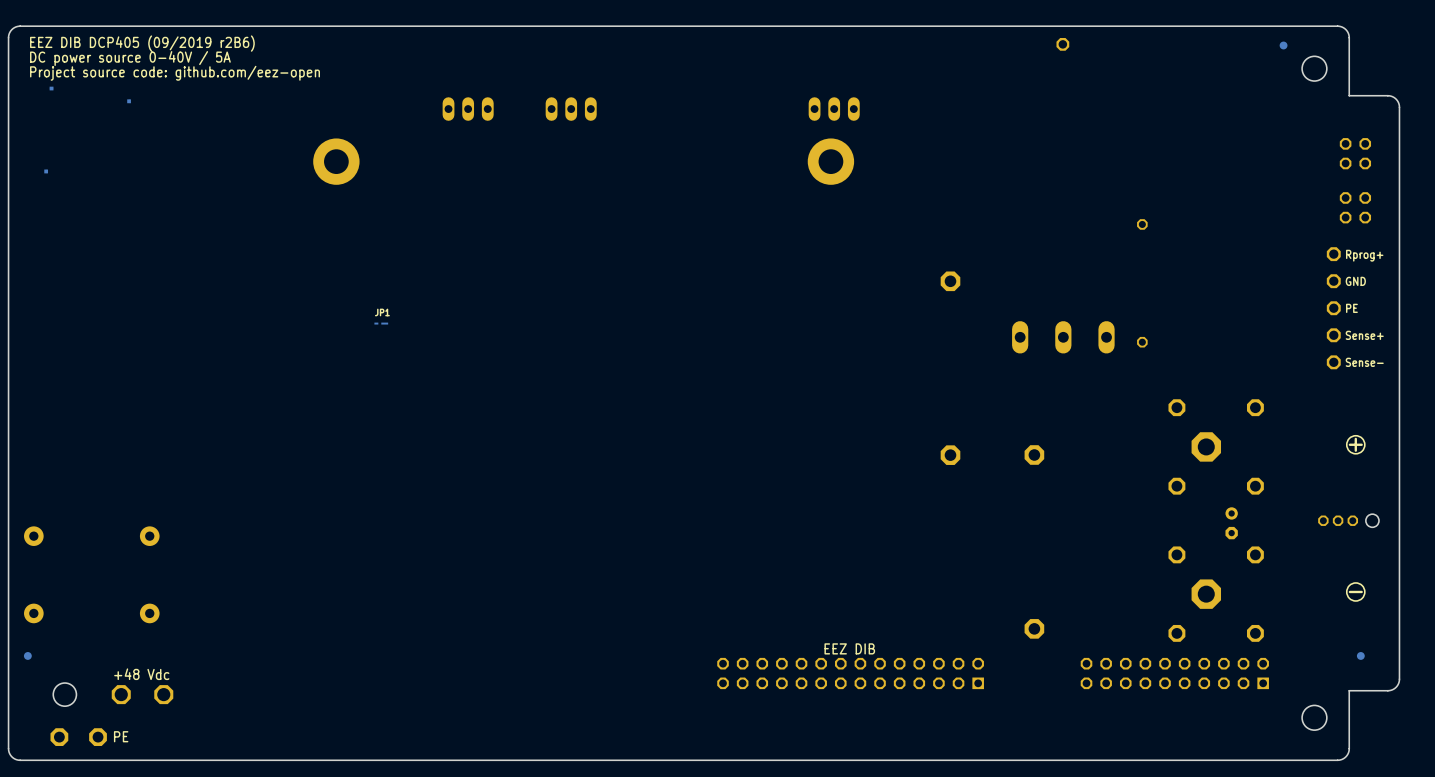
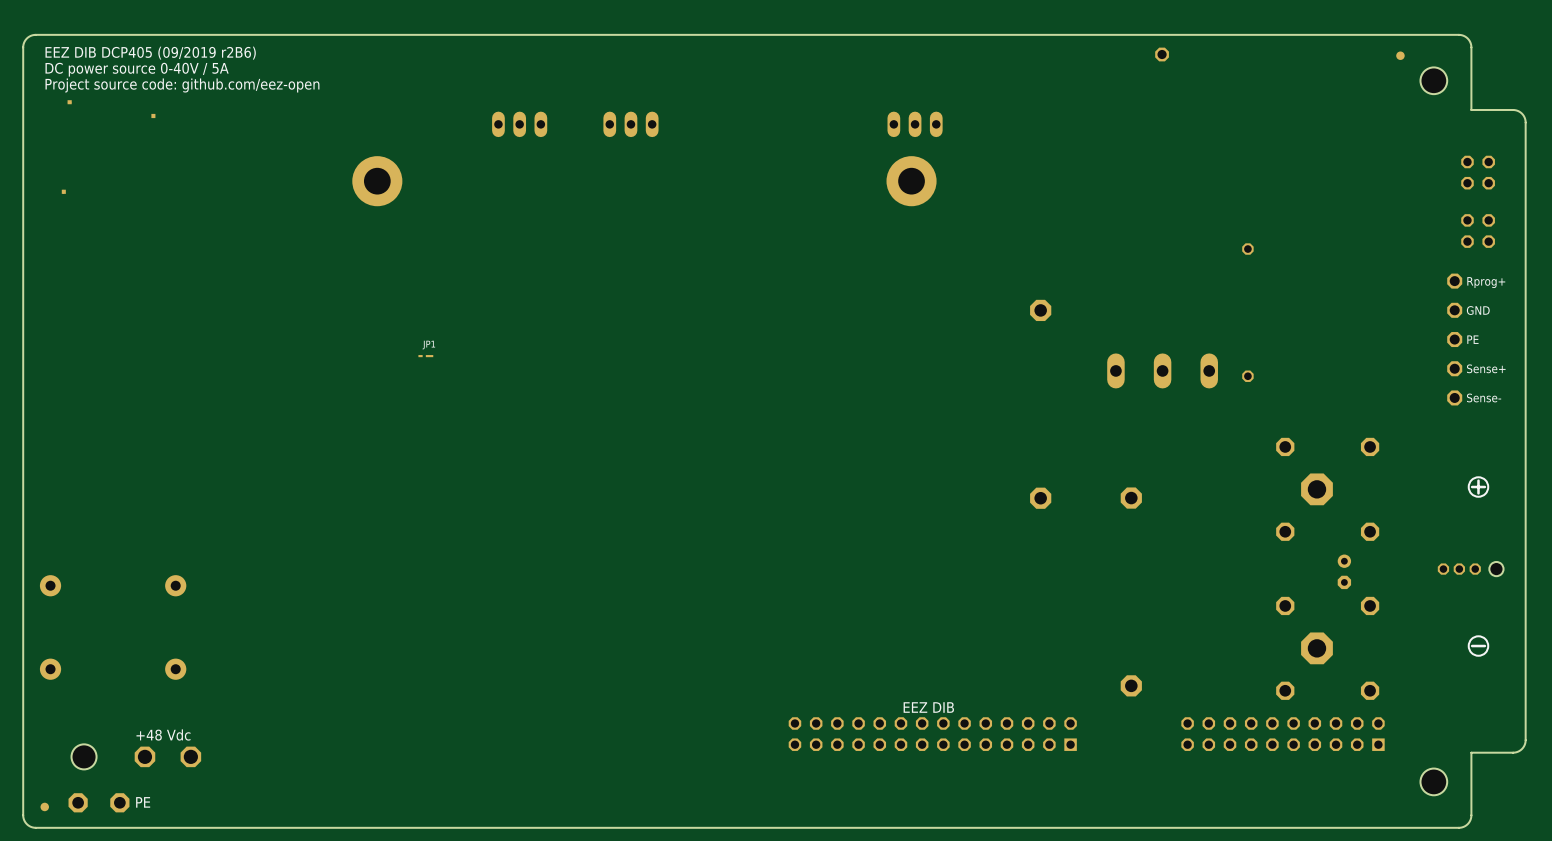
part position: (27, 655) -> (44, 806)
part: (1360, 655) -> none

